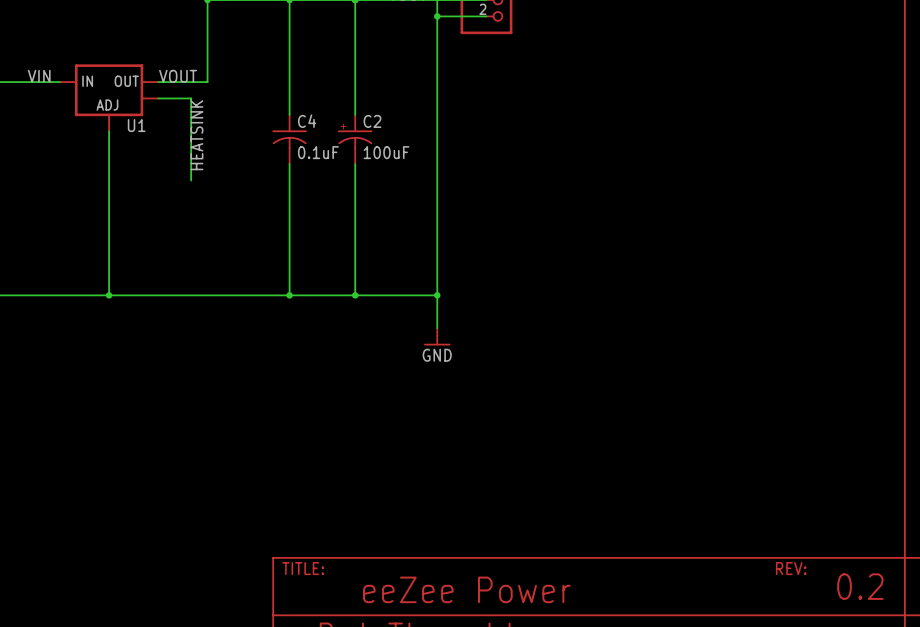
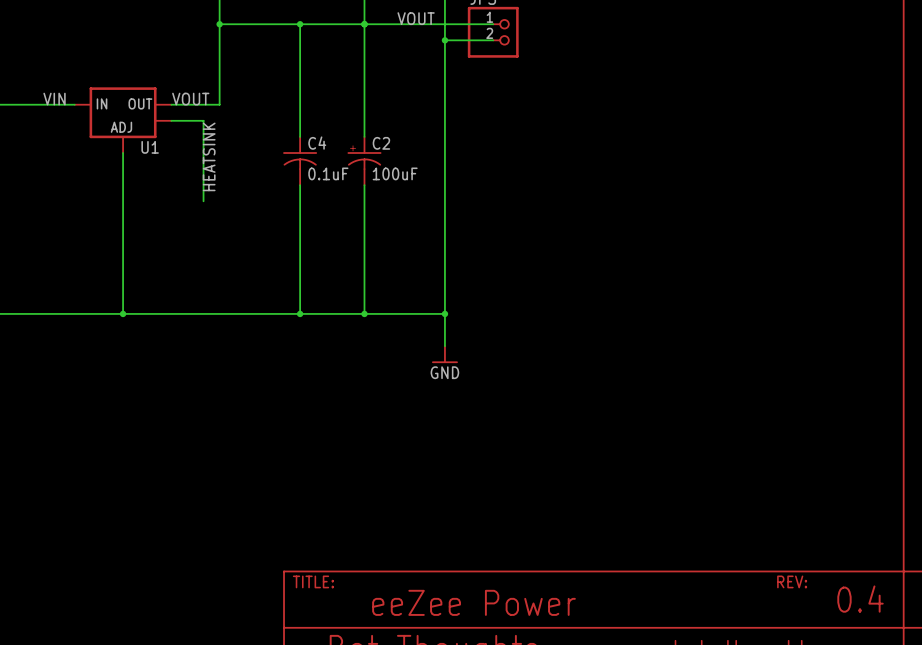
text: 0.2 (860, 586) -> 0.4 (860, 599)

